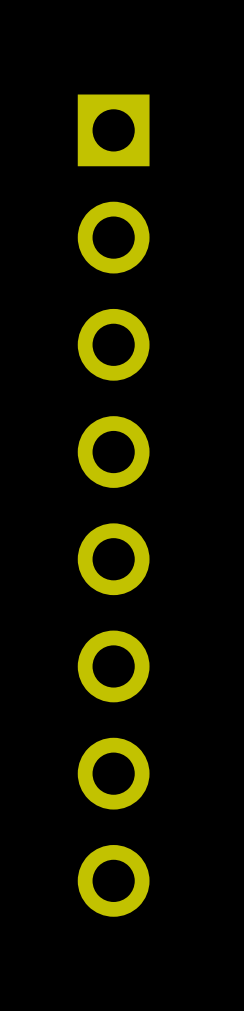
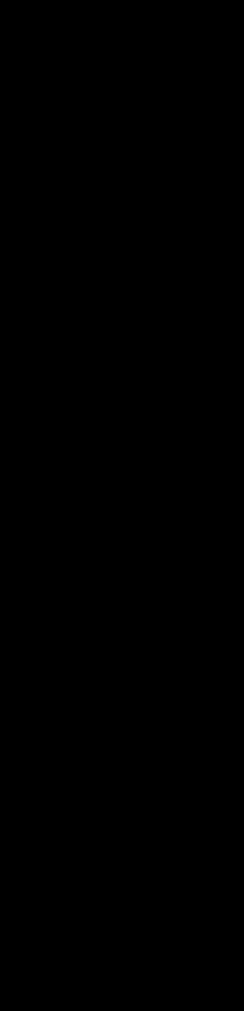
part: (113, 505) -> none

